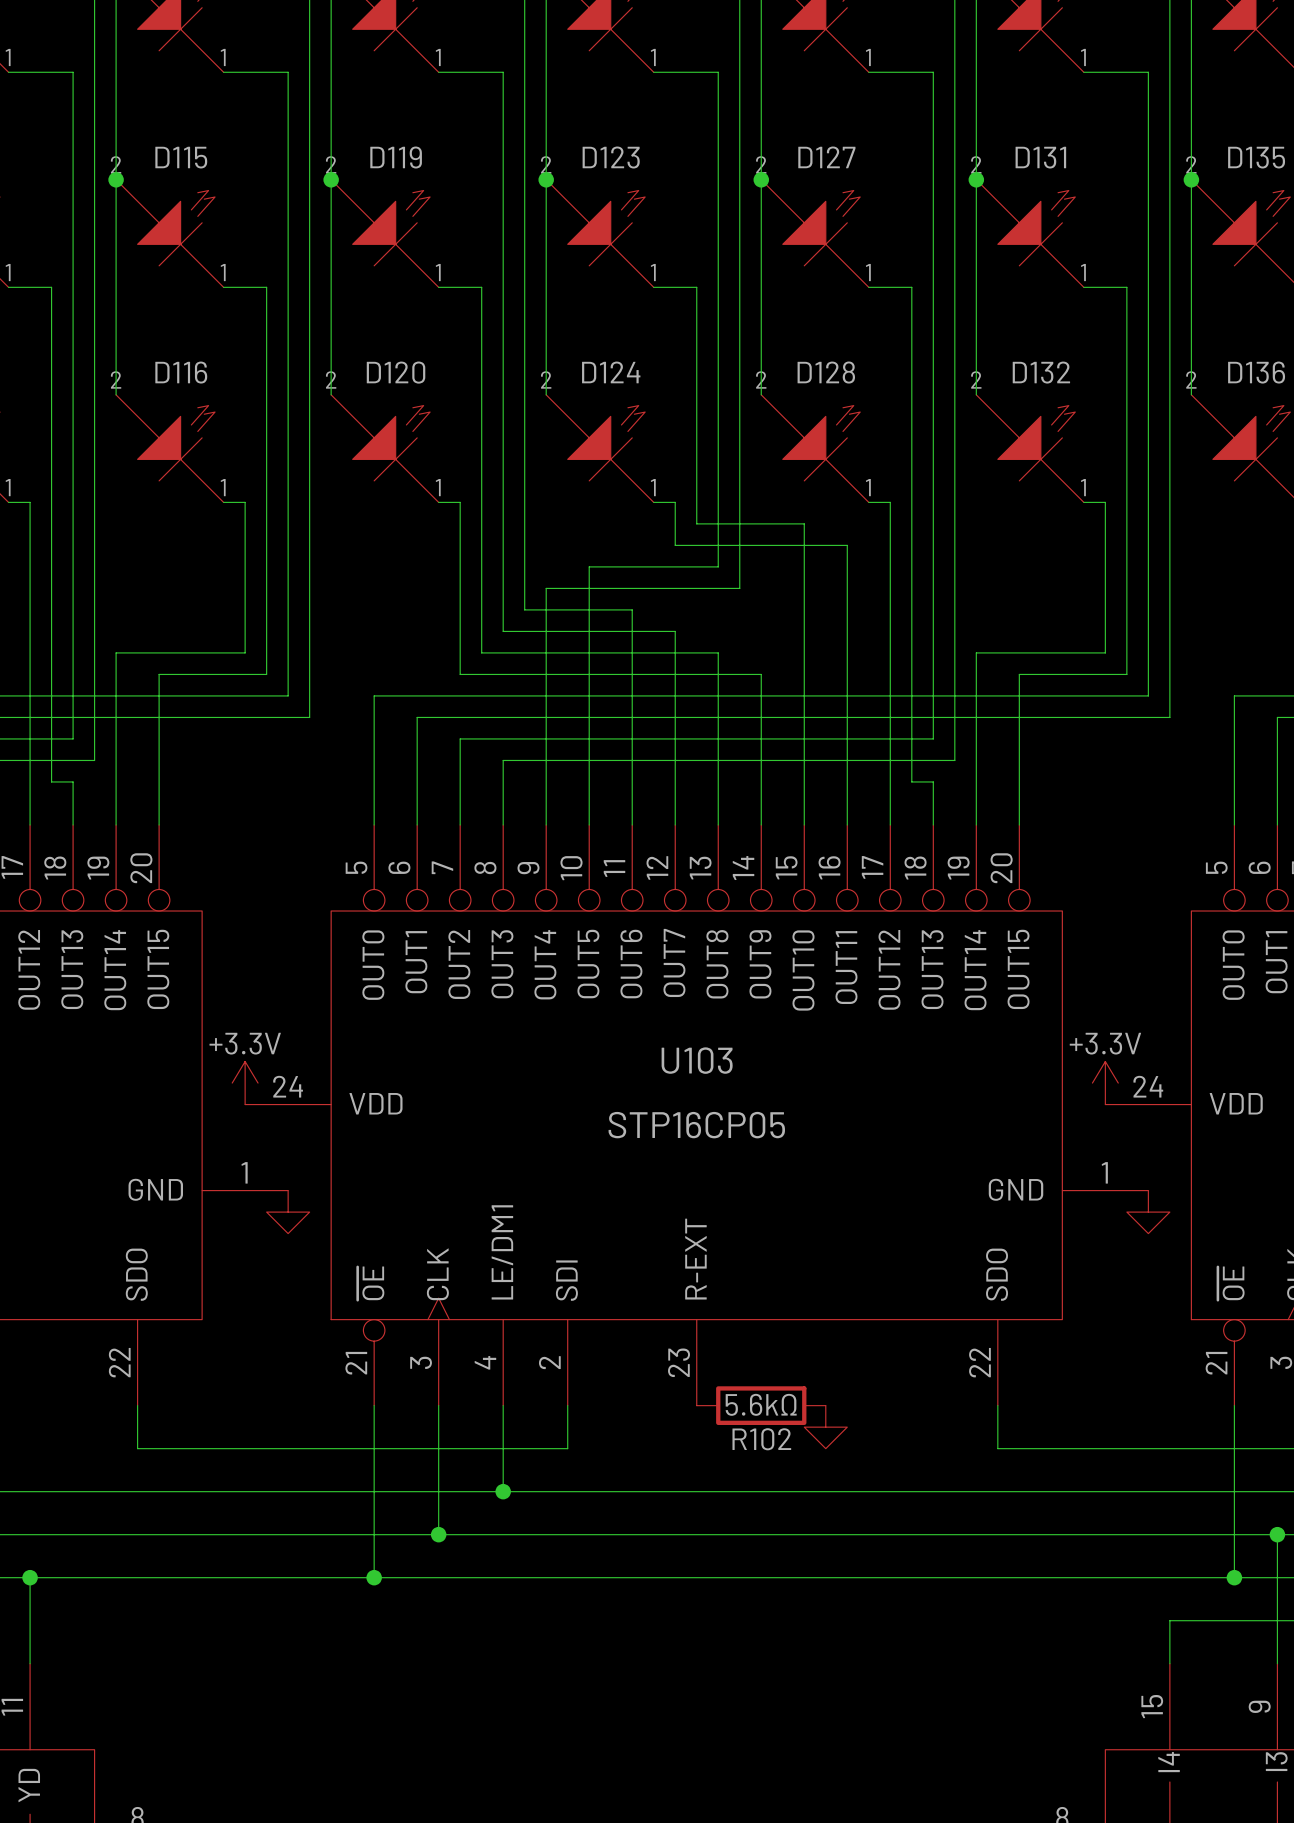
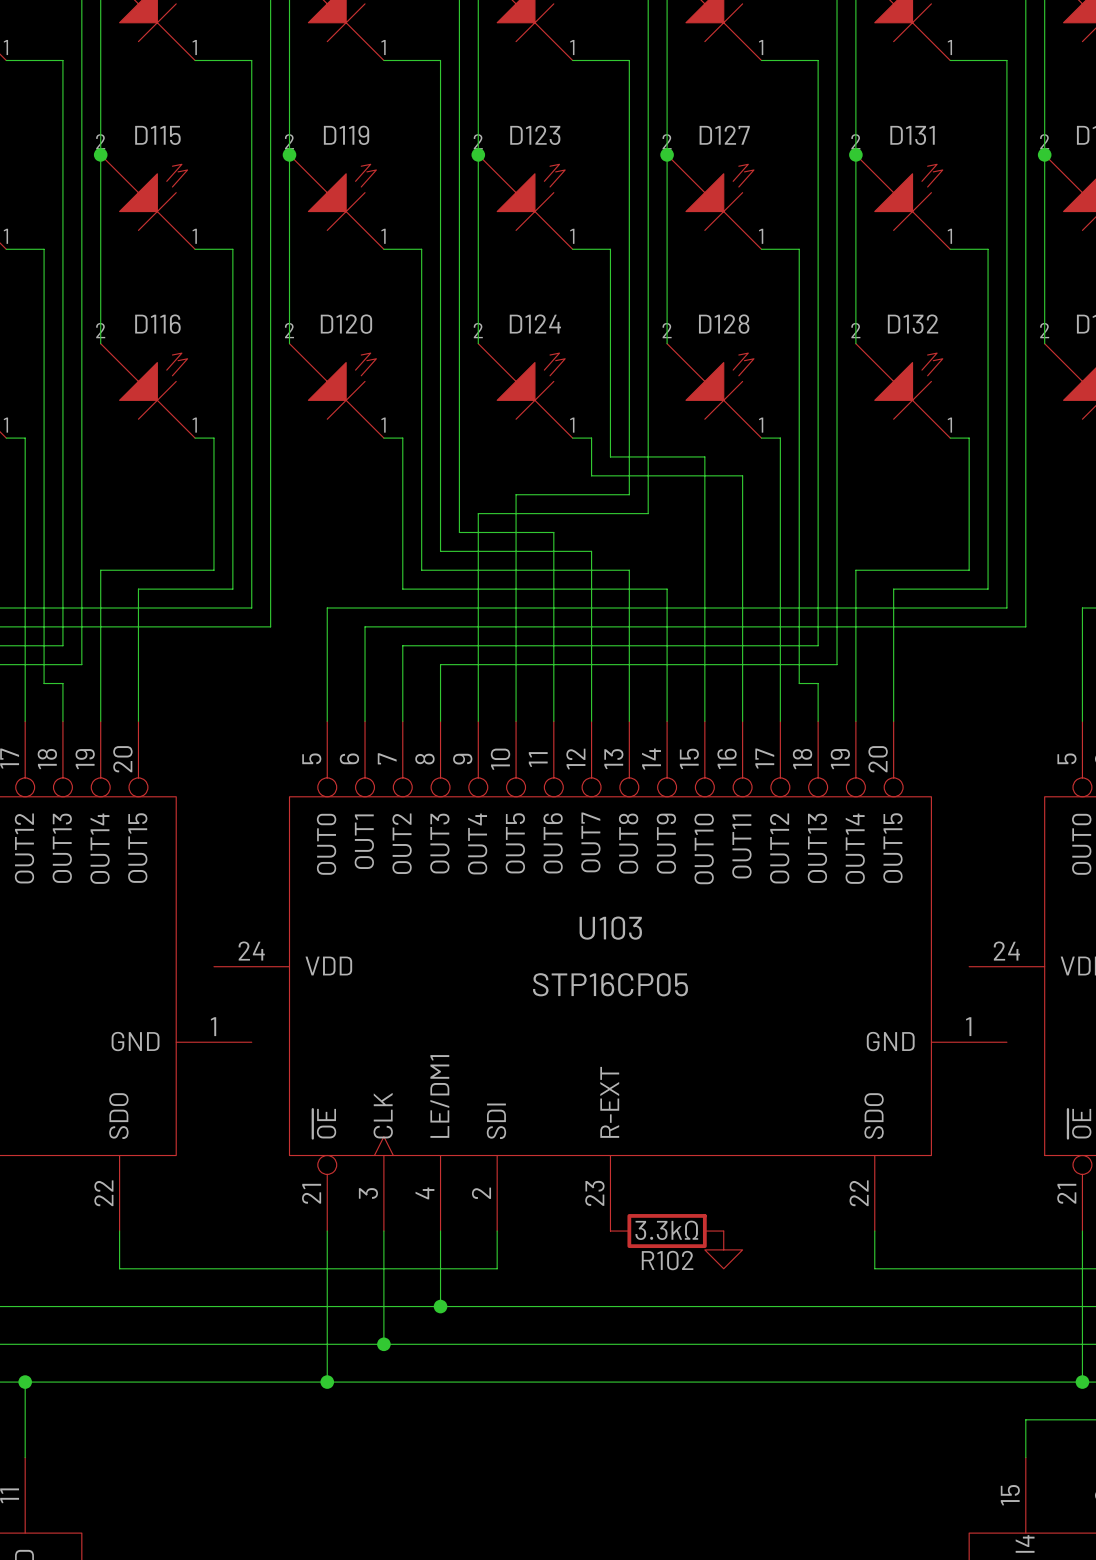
power symbol: +3.3V (245, 1083) -> none
power symbol: +3.3V (1105, 1083) -> none
power symbol: (288, 1212) -> none
power symbol: (1148, 1212) -> none
R102 value: 5.6kΩ (761, 1404) -> 3.3kΩ (666, 1230)

